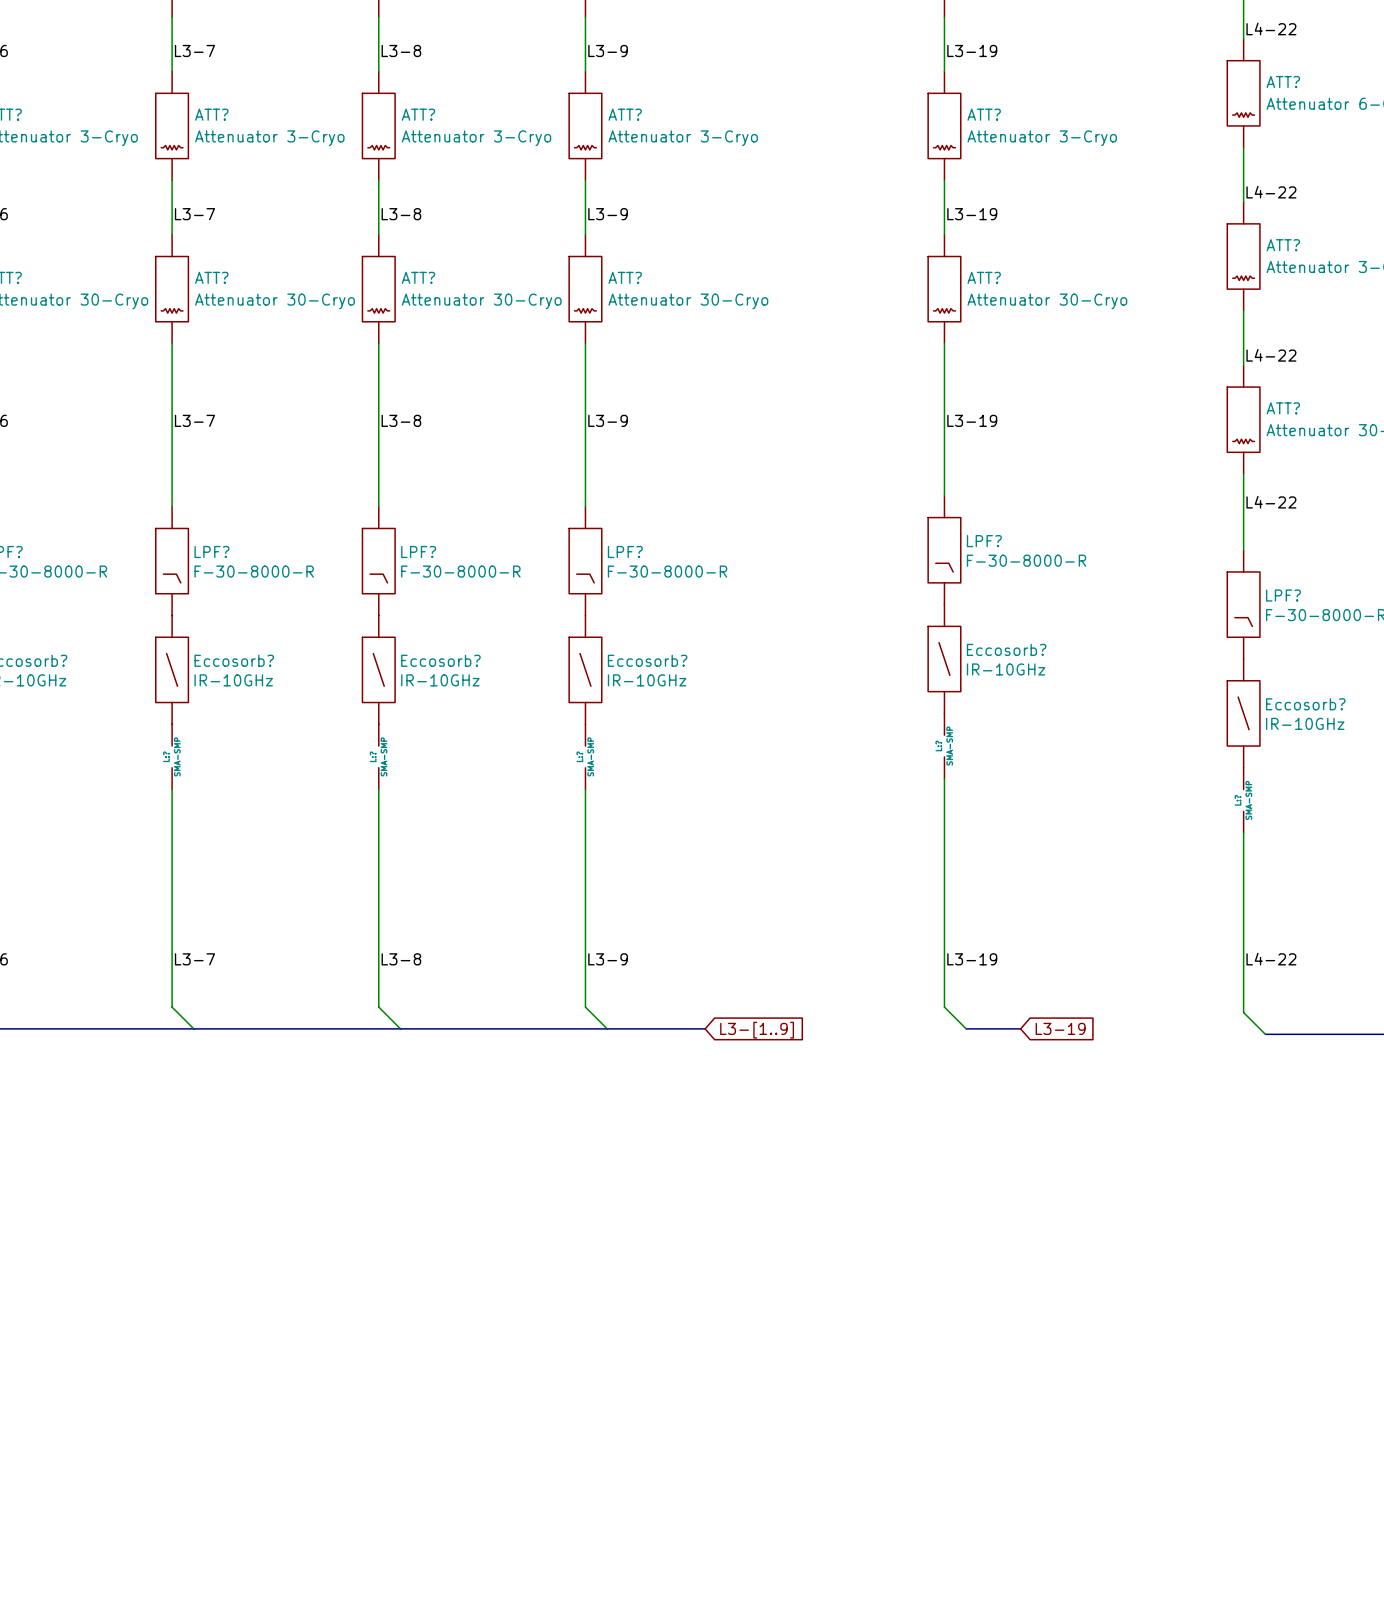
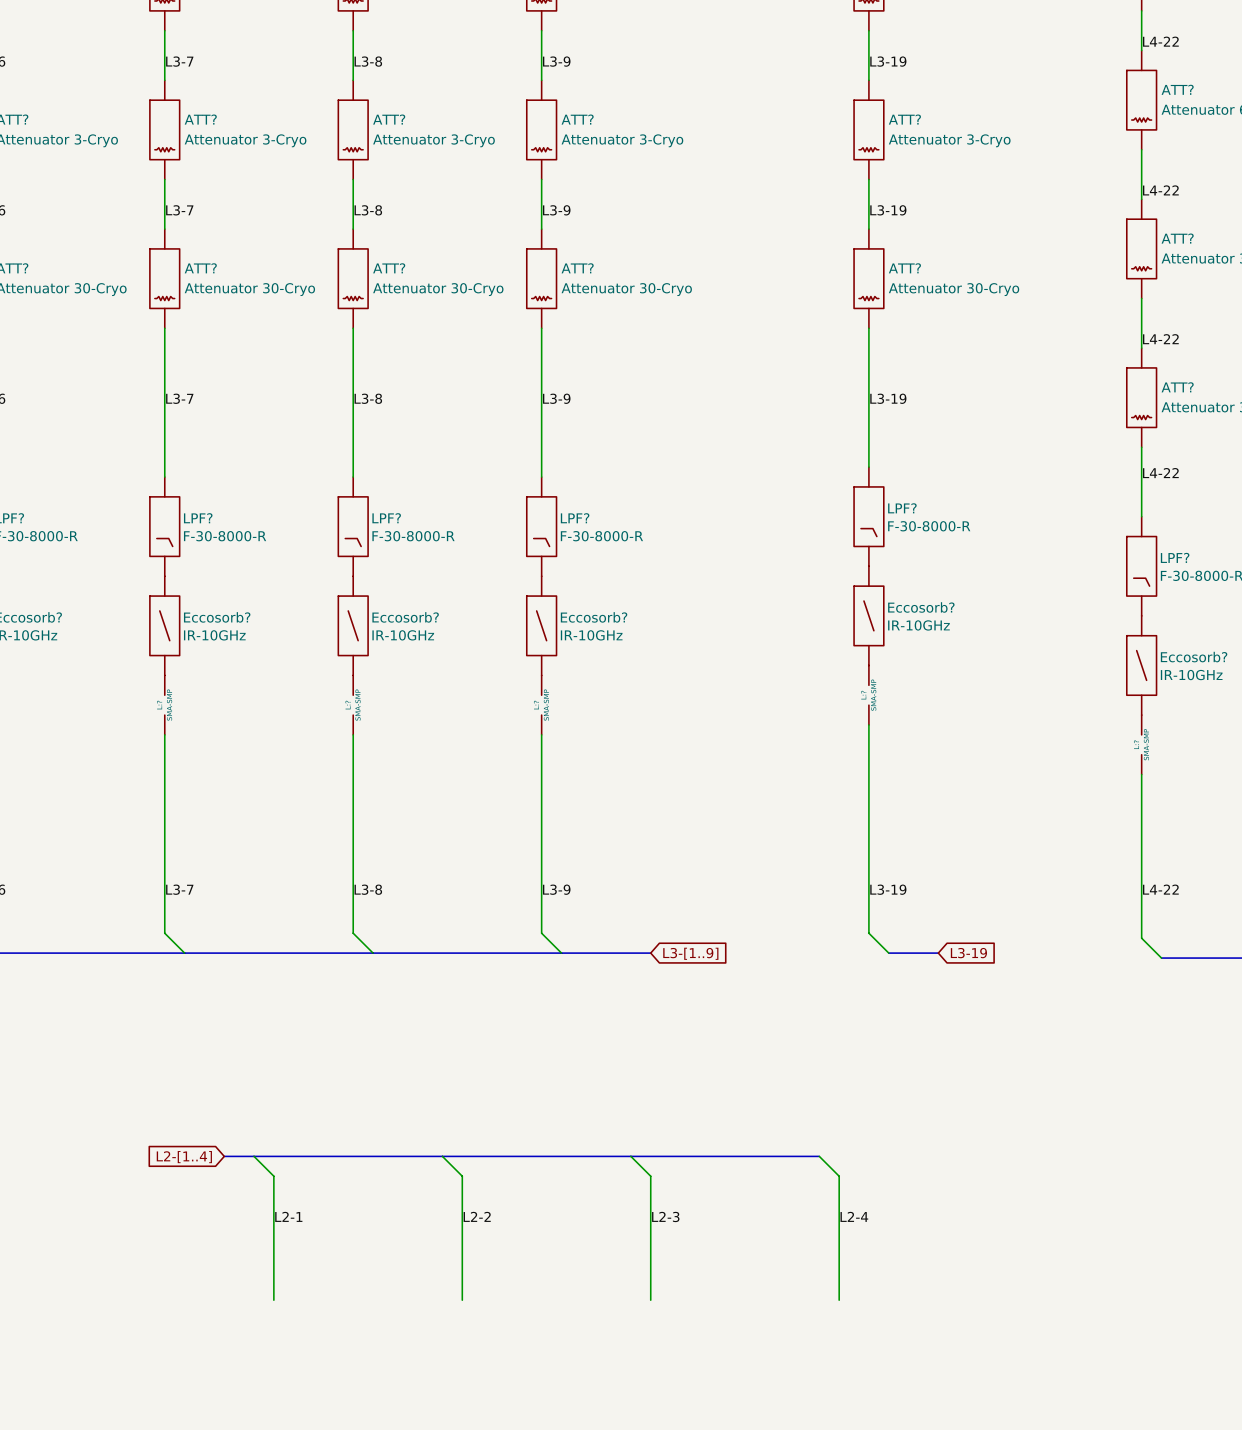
bus: none -> (224, 1156) (819, 1156)
wire: none -> (254, 1156) (273, 1176) (273, 1300)
wire: none -> (442, 1156) (462, 1176) (462, 1300)
wire: none -> (630, 1156) (650, 1176) (650, 1300)
wire: none -> (819, 1156) (839, 1176) (839, 1300)
global label: none -> L2-[1..4] (184, 1157)
label: none -> L2-1 (288, 1216)
label: none -> L2-2 (477, 1216)
label: none -> L2-3 (665, 1216)
label: none -> L2-4 (854, 1216)

